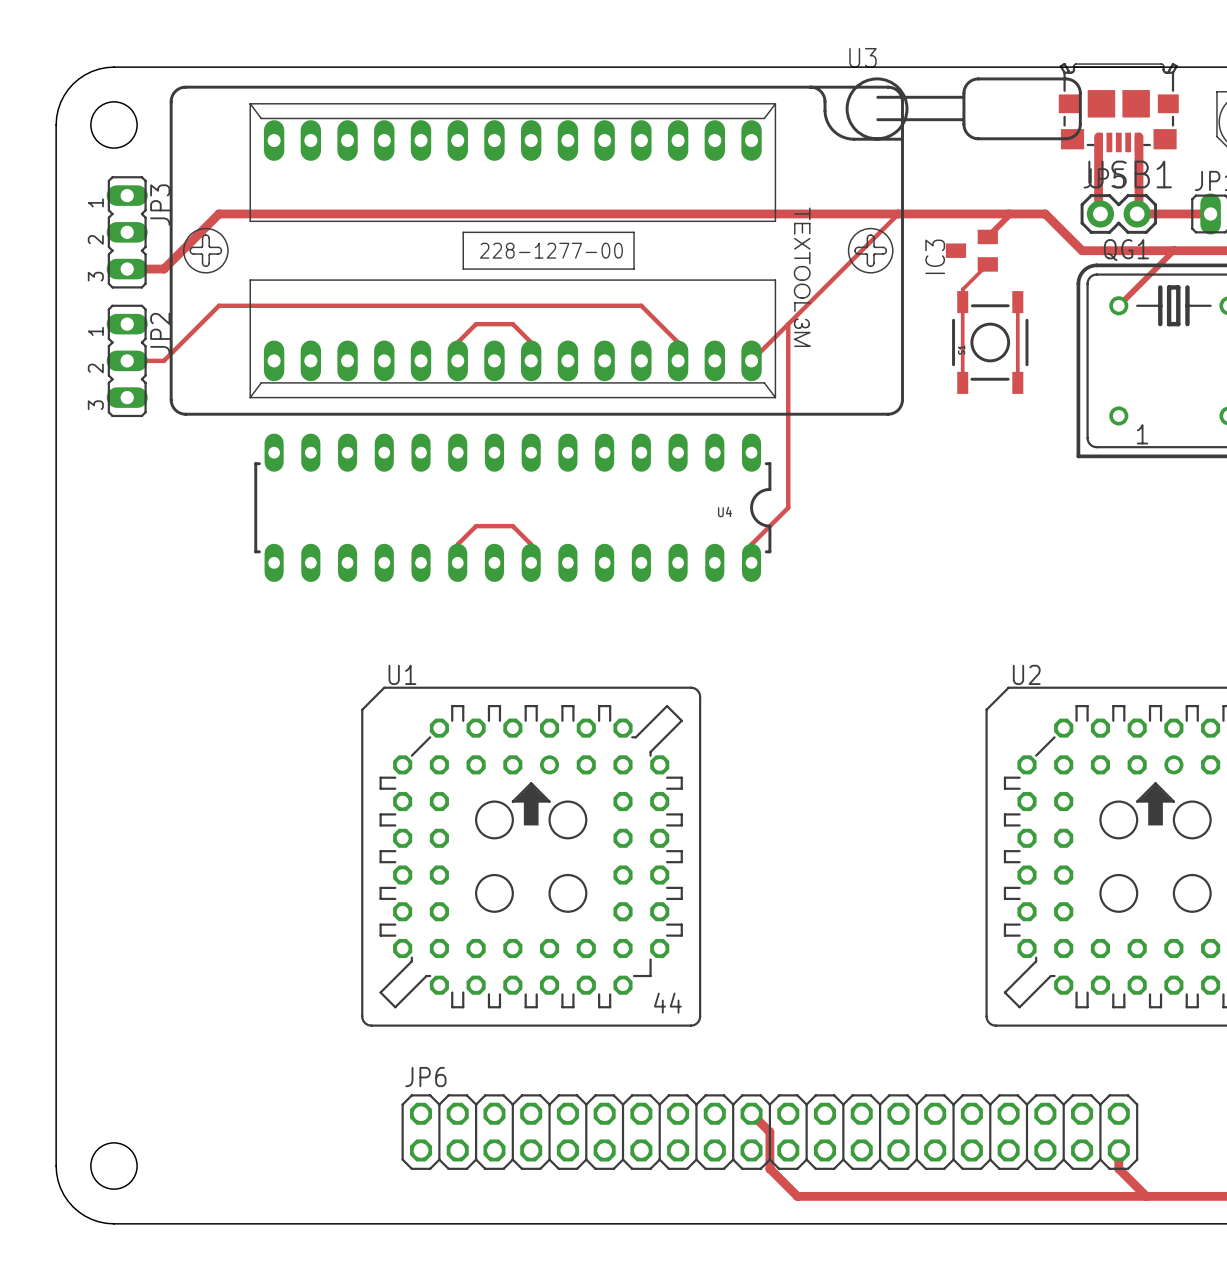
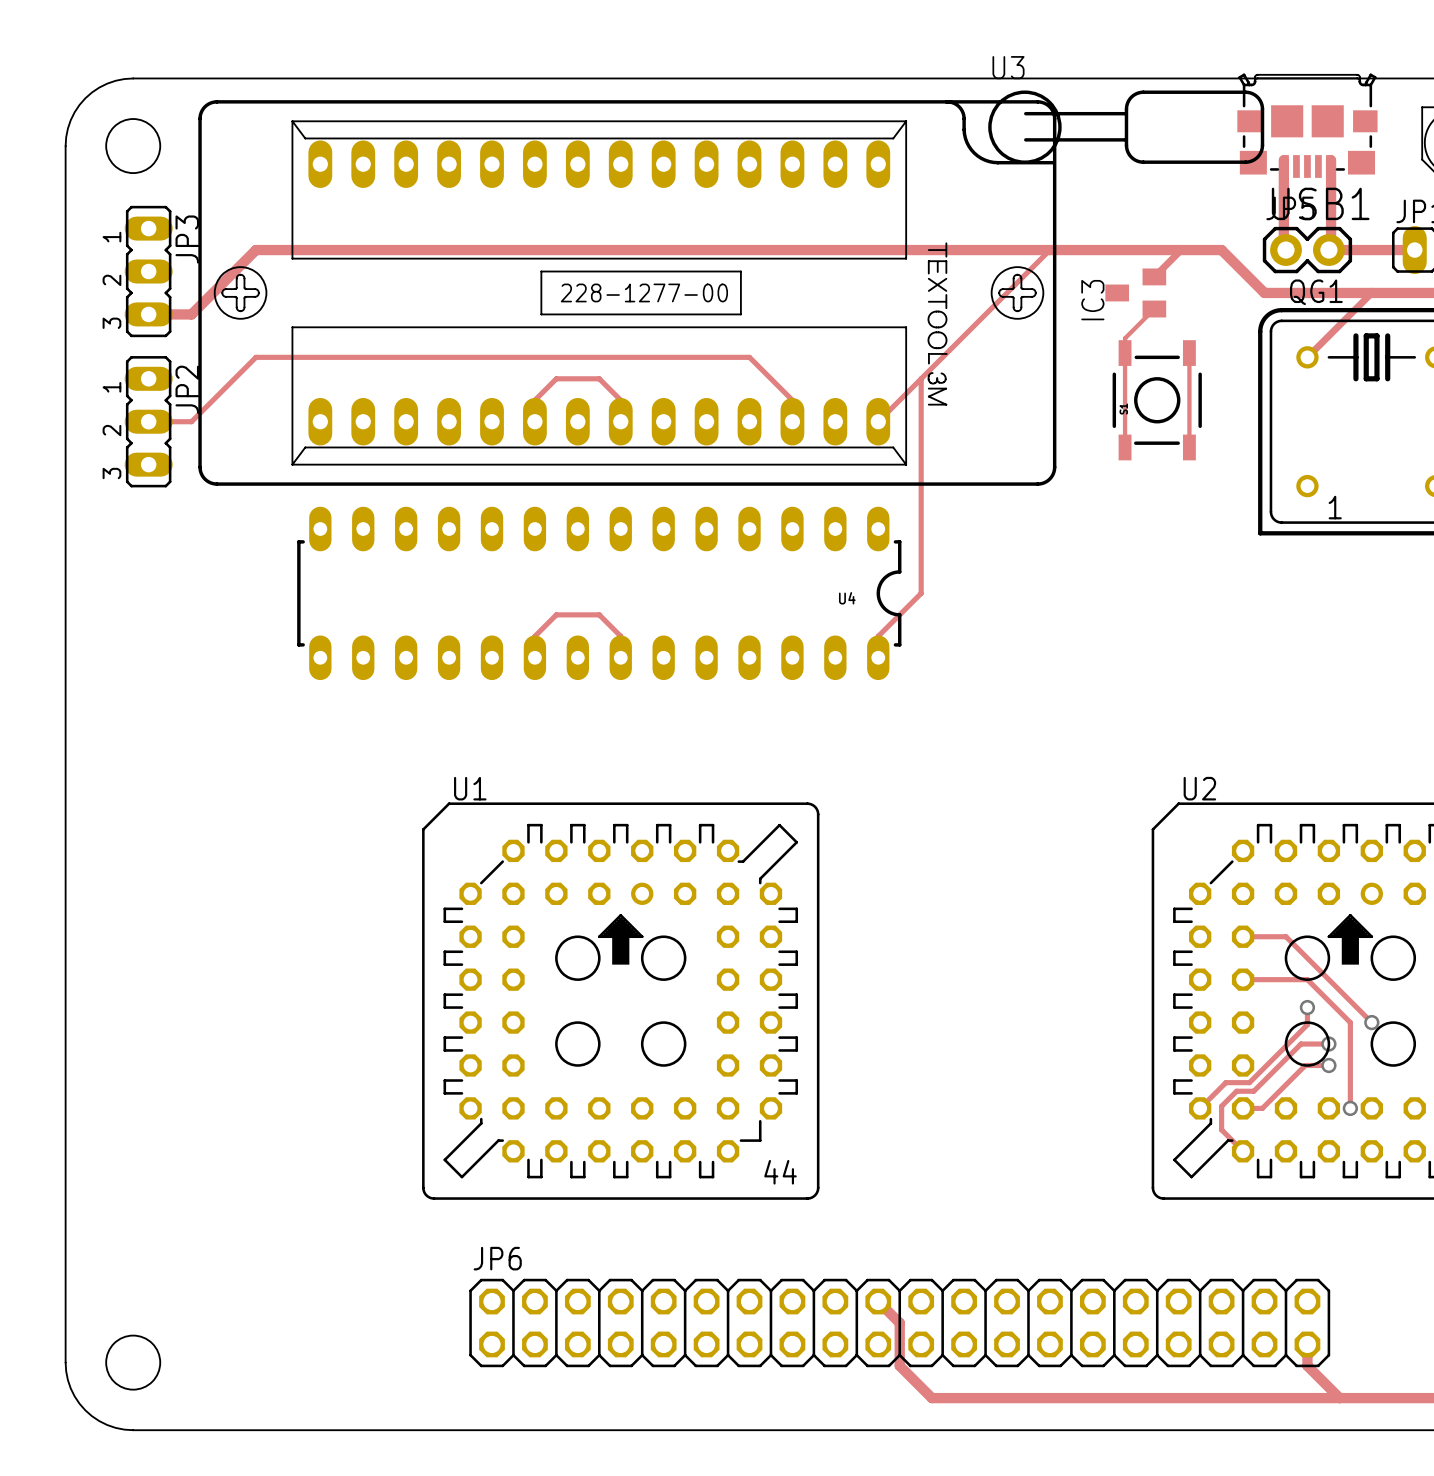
track: none -> (1243, 936) (1285, 936) (1371, 1022)
track: none -> (1243, 979) (1307, 979) (1350, 1022) (1350, 1108)
track: none -> (1307, 1007) (1307, 1024) (1249, 1082) (1225, 1082) (1200, 1108)
via: none -> (1307, 1007)
via: none -> (1371, 1022)
track: none -> (1328, 1044) (1301, 1044) (1253, 1091) (1236, 1091) (1221, 1106) (1221, 1129) (1243, 1151)
via: none -> (1328, 1044)
track: none -> (1328, 1065) (1305, 1065) (1262, 1108) (1243, 1108)
via: none -> (1328, 1065)
via: none -> (1350, 1108)

